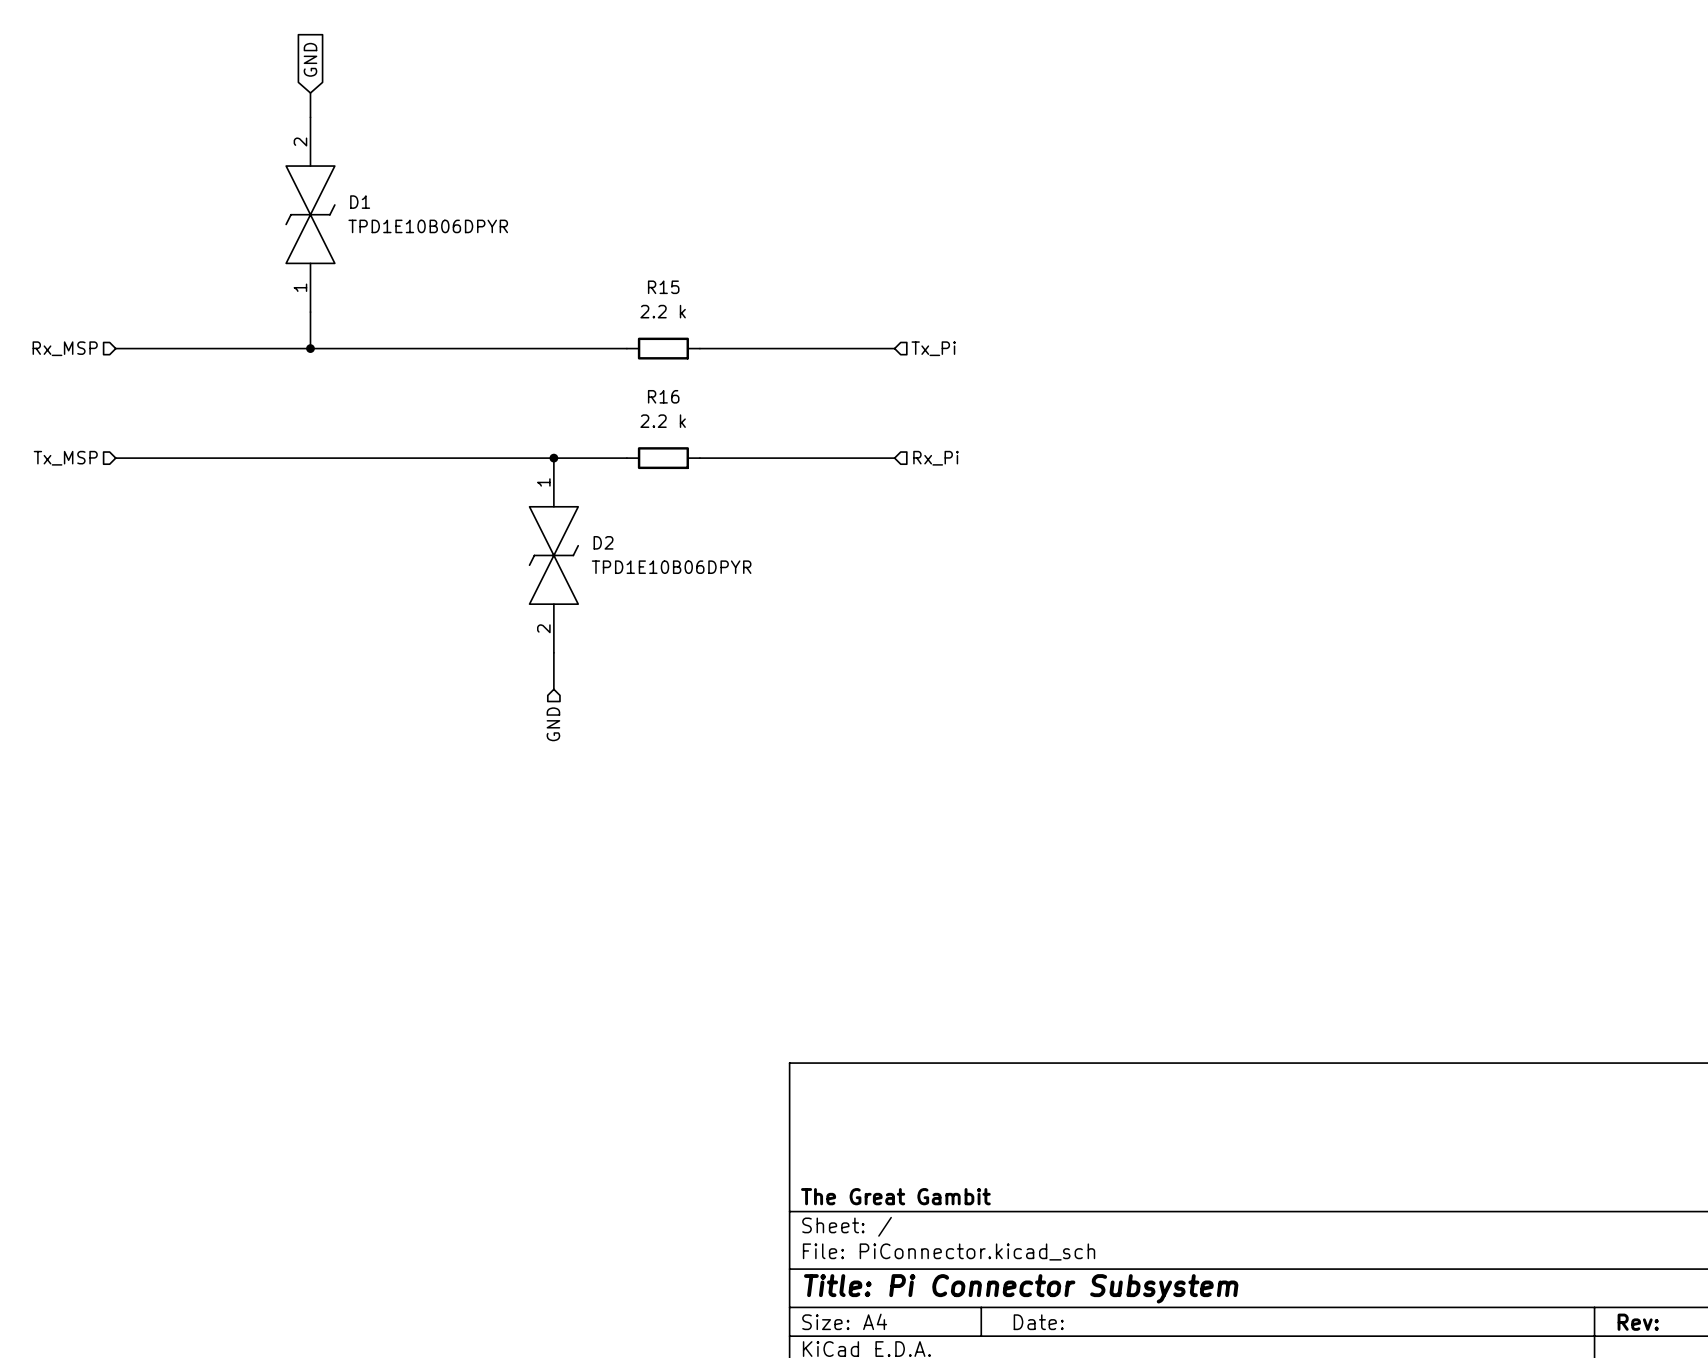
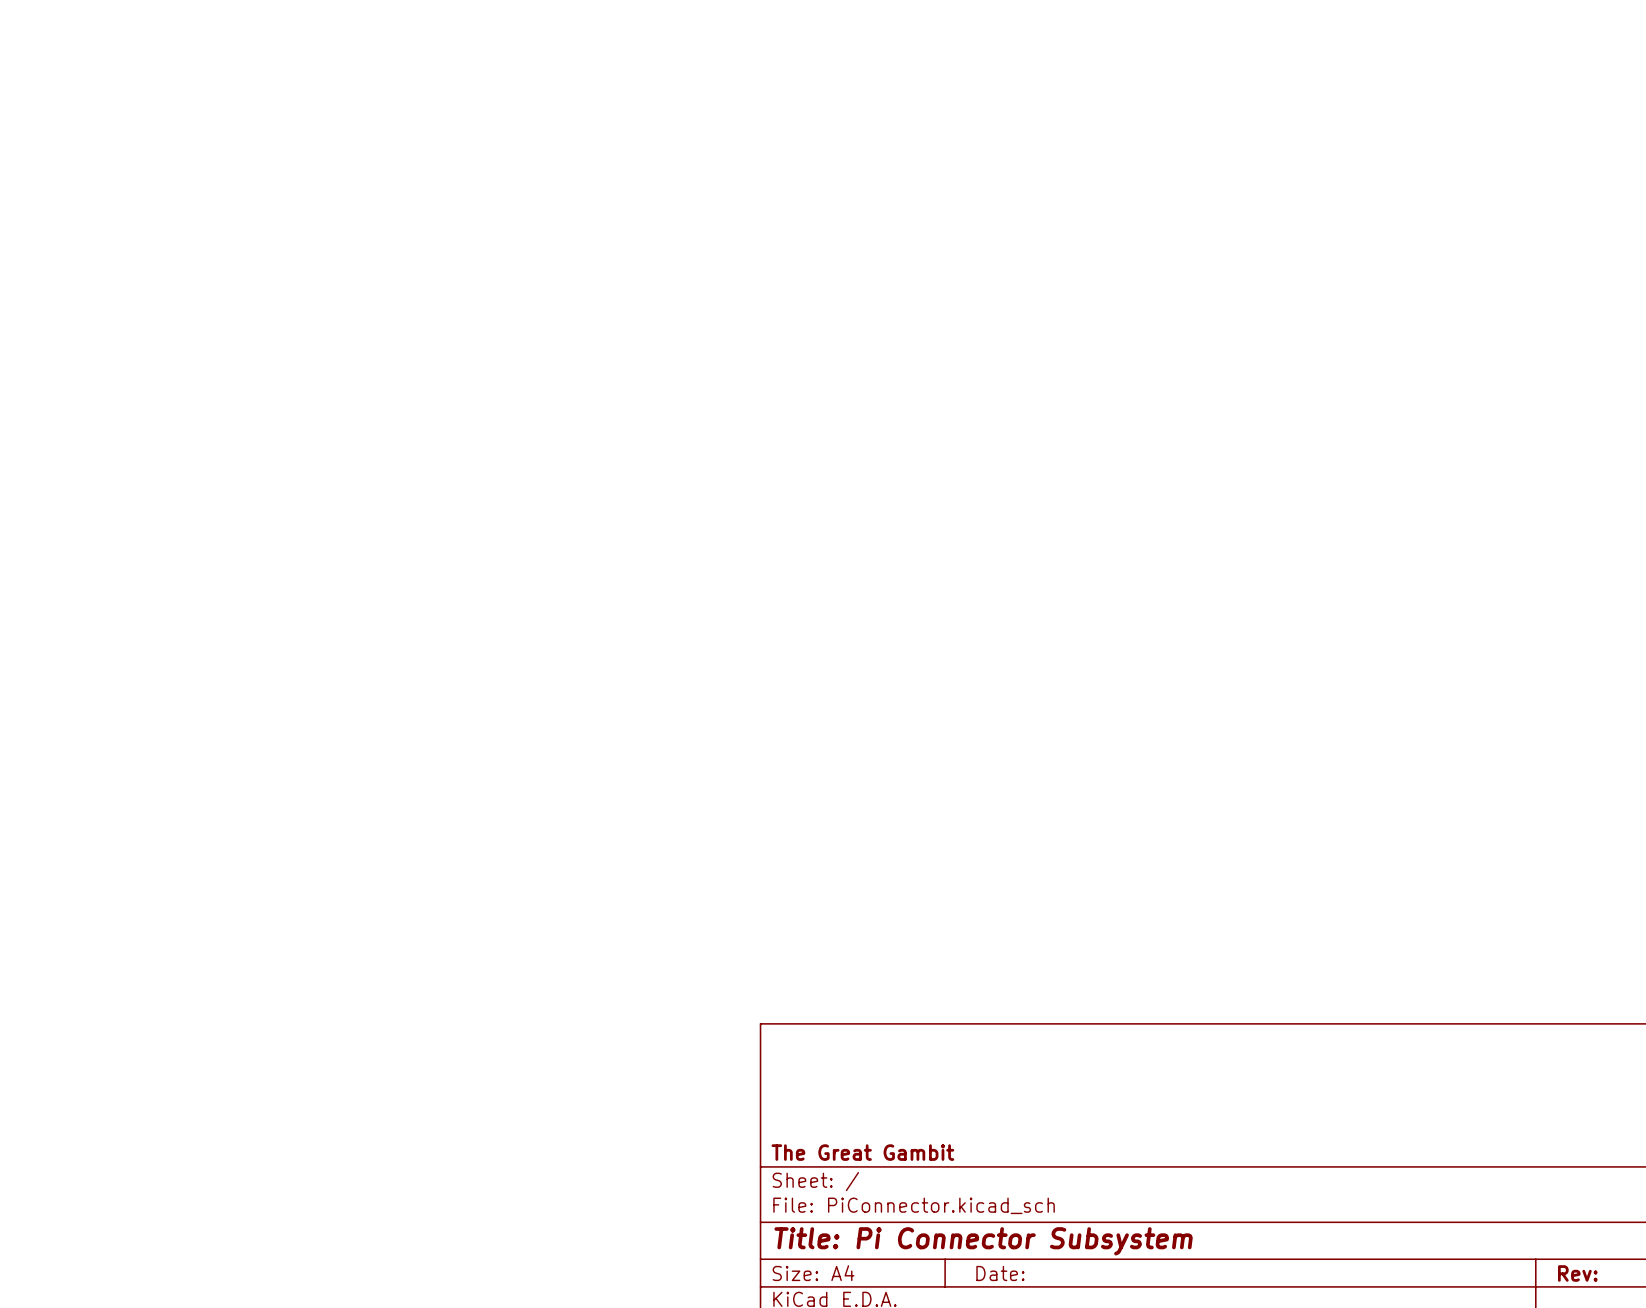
global label: GND (310, 59) -> none
wire: (310, 93) (310, 117) -> none
D1: TPD1E10B06DPYR (310, 214) -> none
wire: (310, 312) (310, 348) -> none
hierarchical label: Rx_MSP (65, 348) -> none
wire: (115, 348) (626, 348) -> none
junction: (310, 348) -> none
R15: 2.2 k (663, 348) -> none
wire: (699, 348) (894, 348) -> none
hierarchical label: Tx_Pi (933, 348) -> none
hierarchical label: Tx_MSP (65, 458) -> none
wire: (115, 458) (626, 458) -> none
junction: (553, 458) -> none
R16: 2.2 k (663, 458) -> none
wire: (699, 458) (894, 458) -> none
hierarchical label: Rx_Pi (935, 458) -> none
D2: TPD1E10B06DPYR (553, 555) -> none
wire: (553, 652) (553, 689) -> none
hierarchical label: GND (553, 724) -> none

